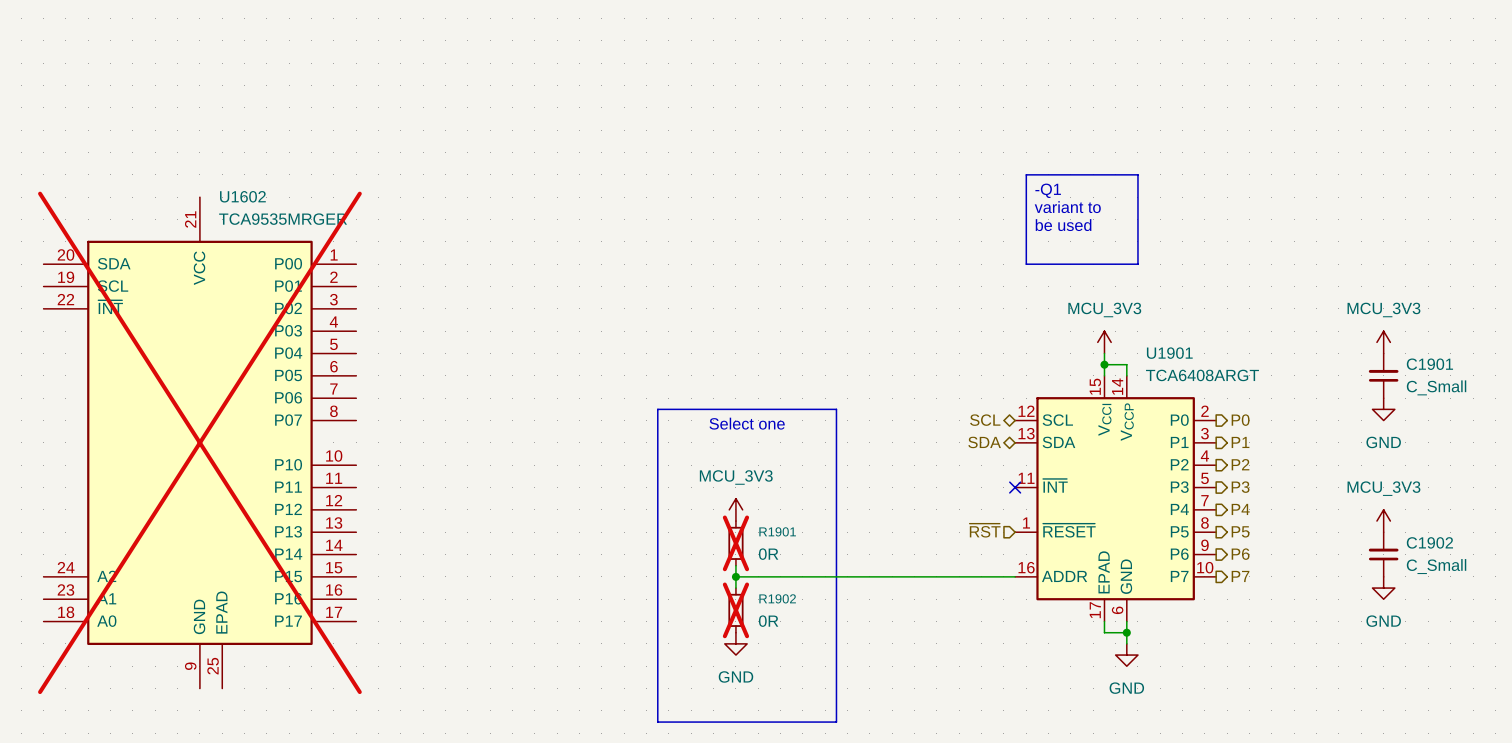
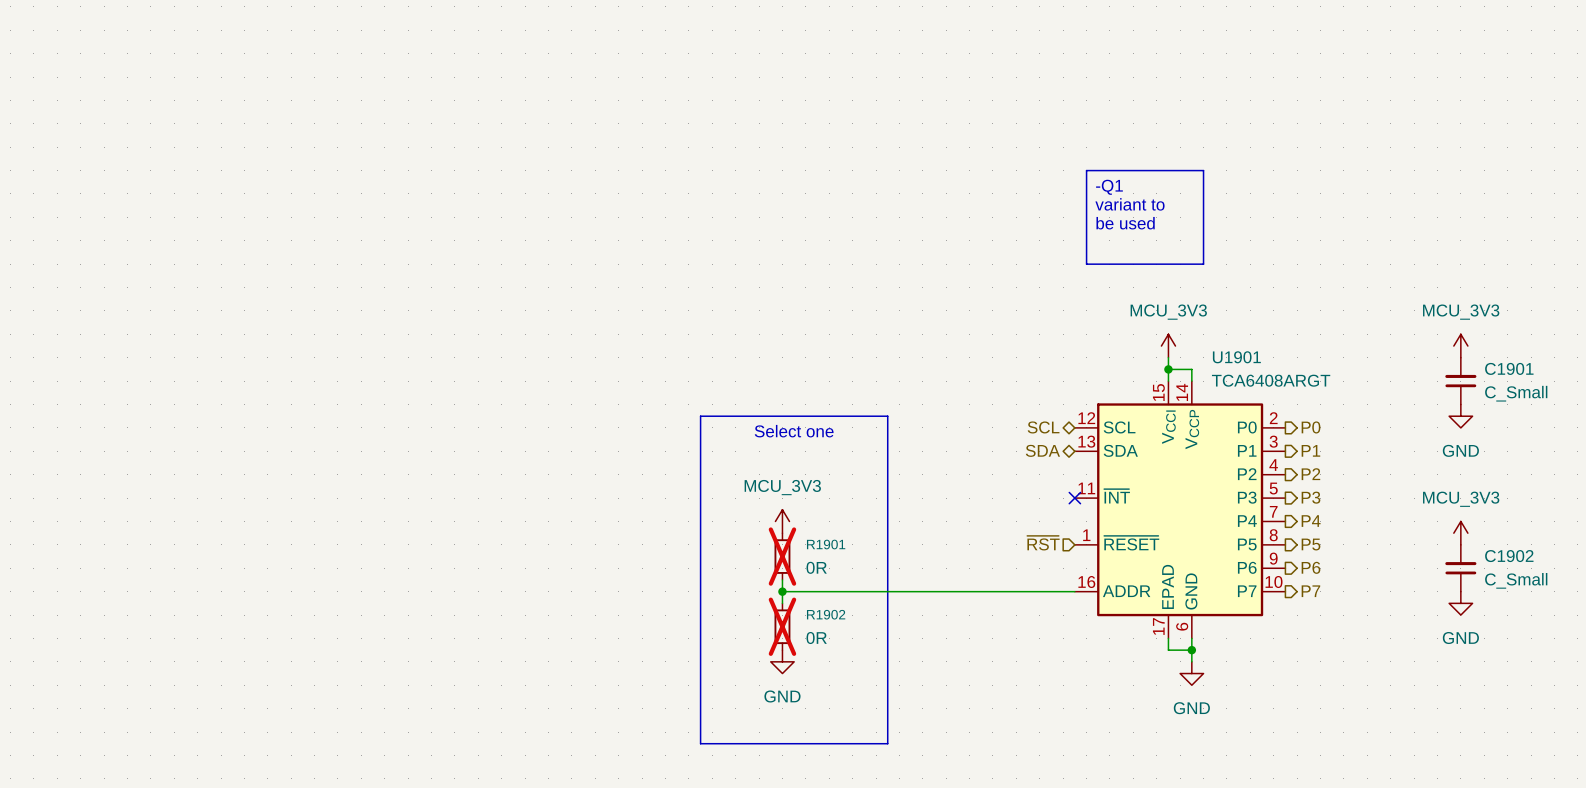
U1602: TCA9535MRGER (199, 442) -> none

